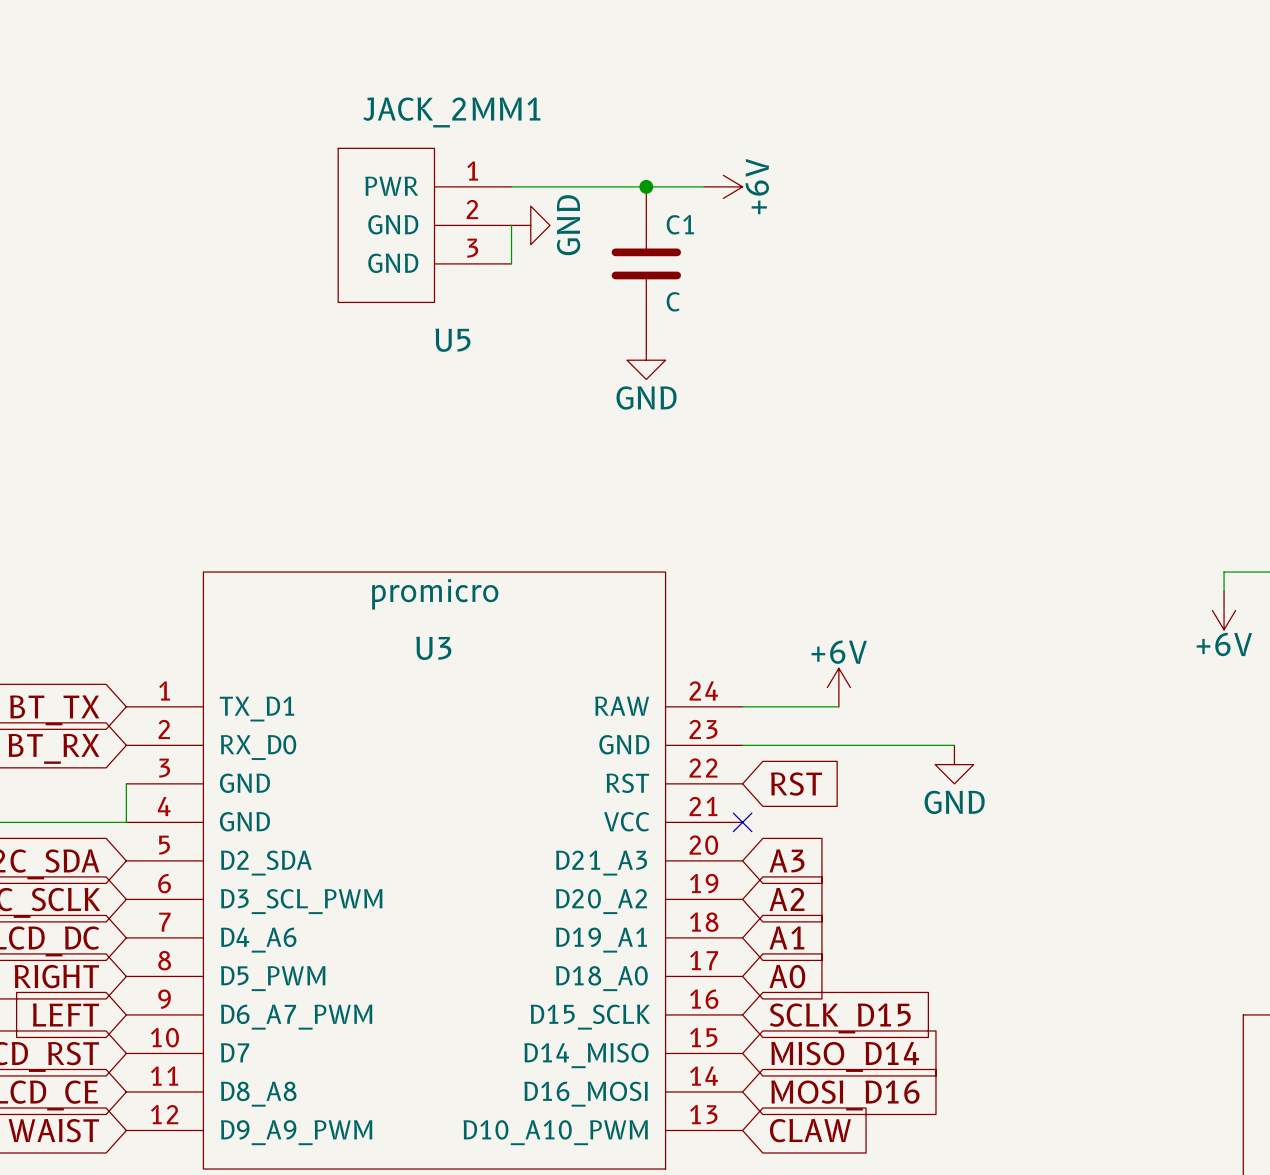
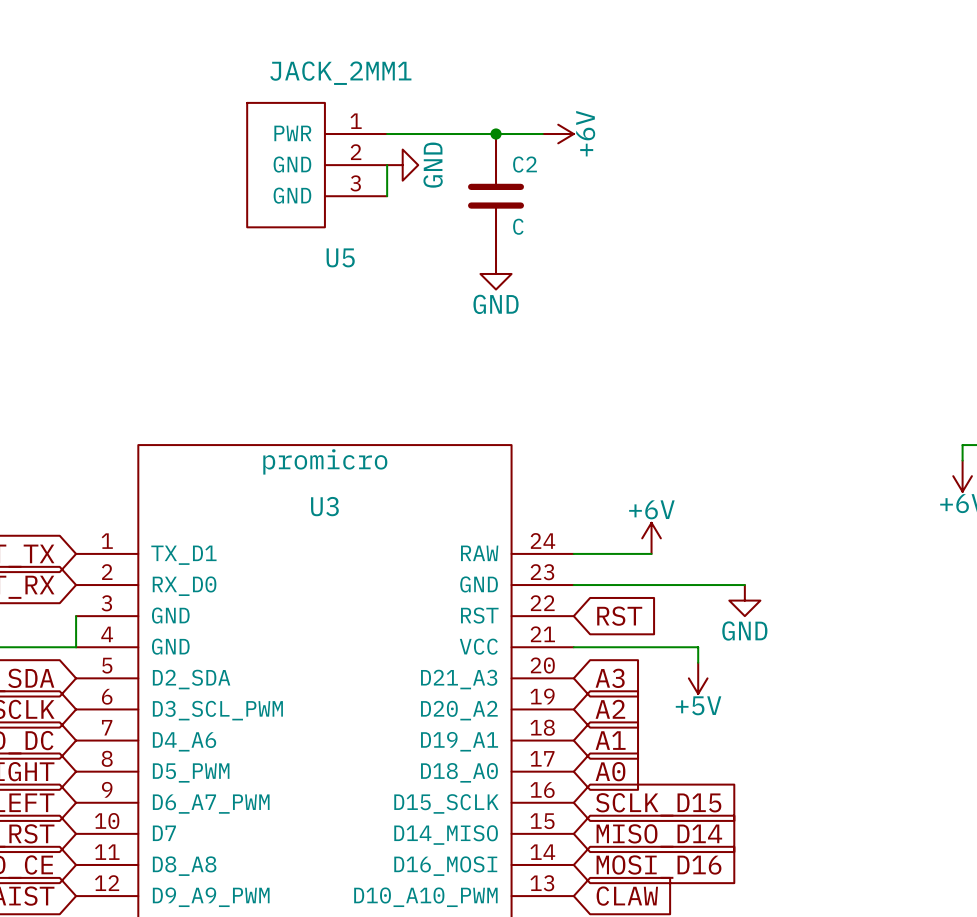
C1 name: C1 (680, 224) -> C2 (525, 164)
wire: none -> (573, 647) (698, 647) (698, 662)
no-connect mark: (742, 822) -> none
power symbol: none -> +5V (698, 678)

